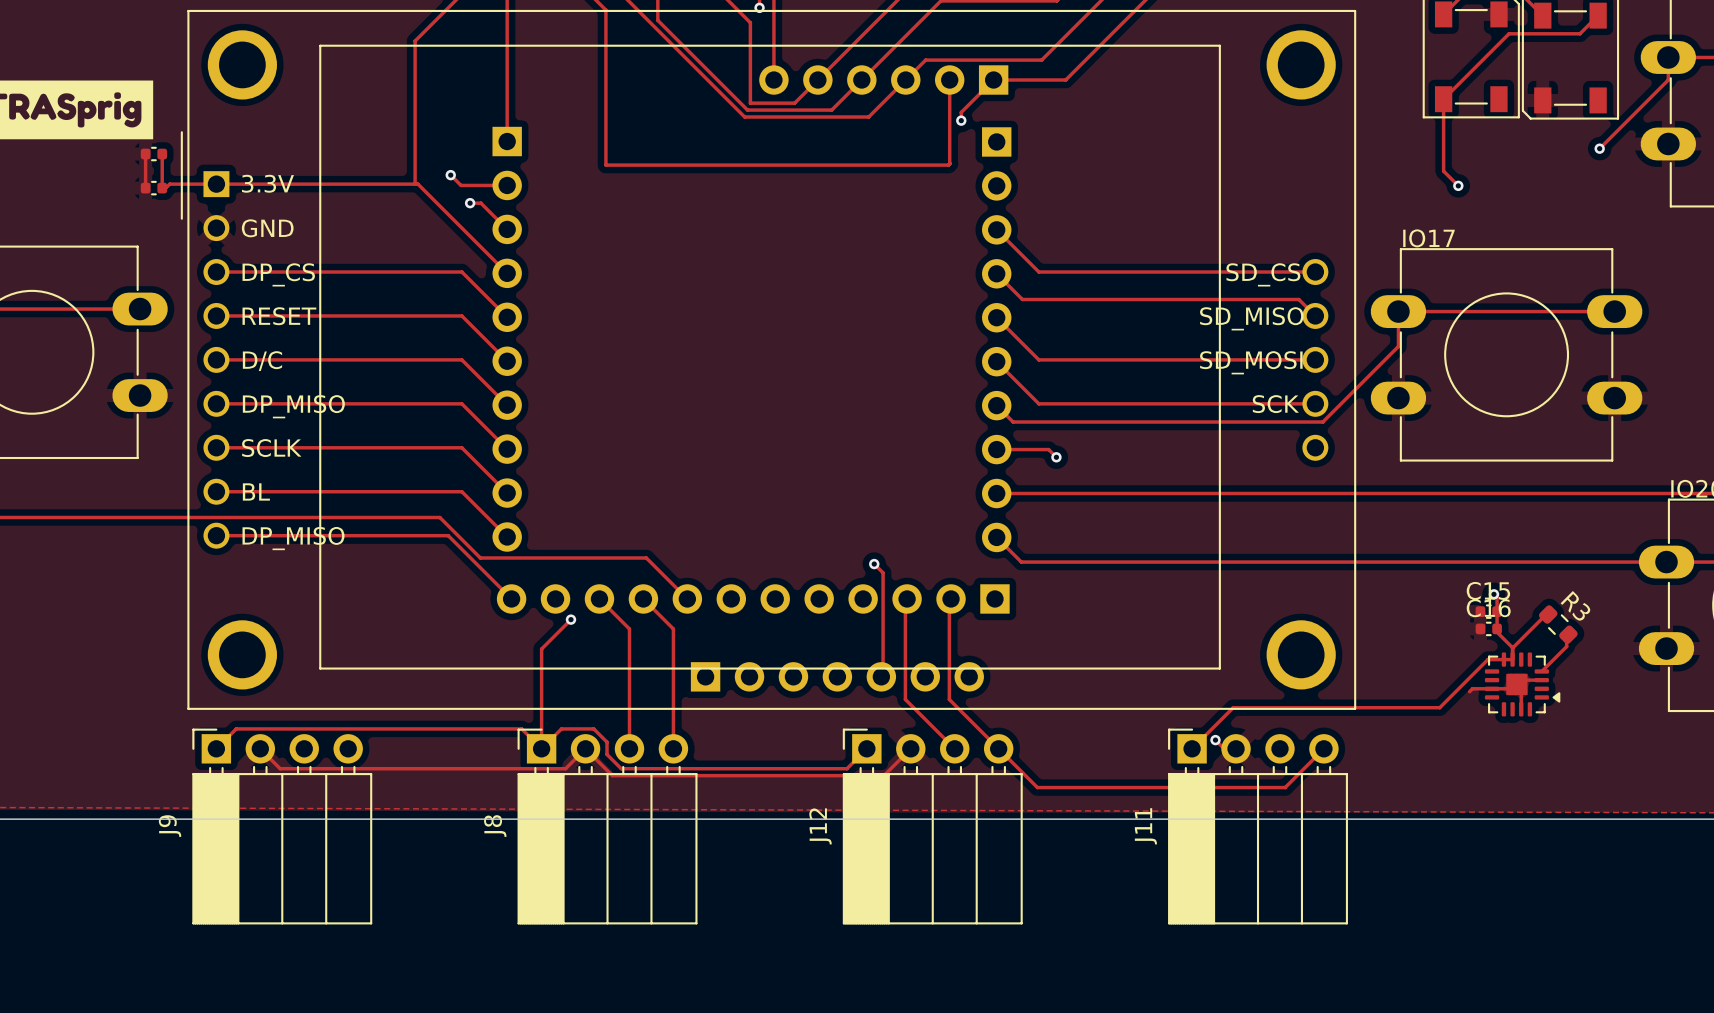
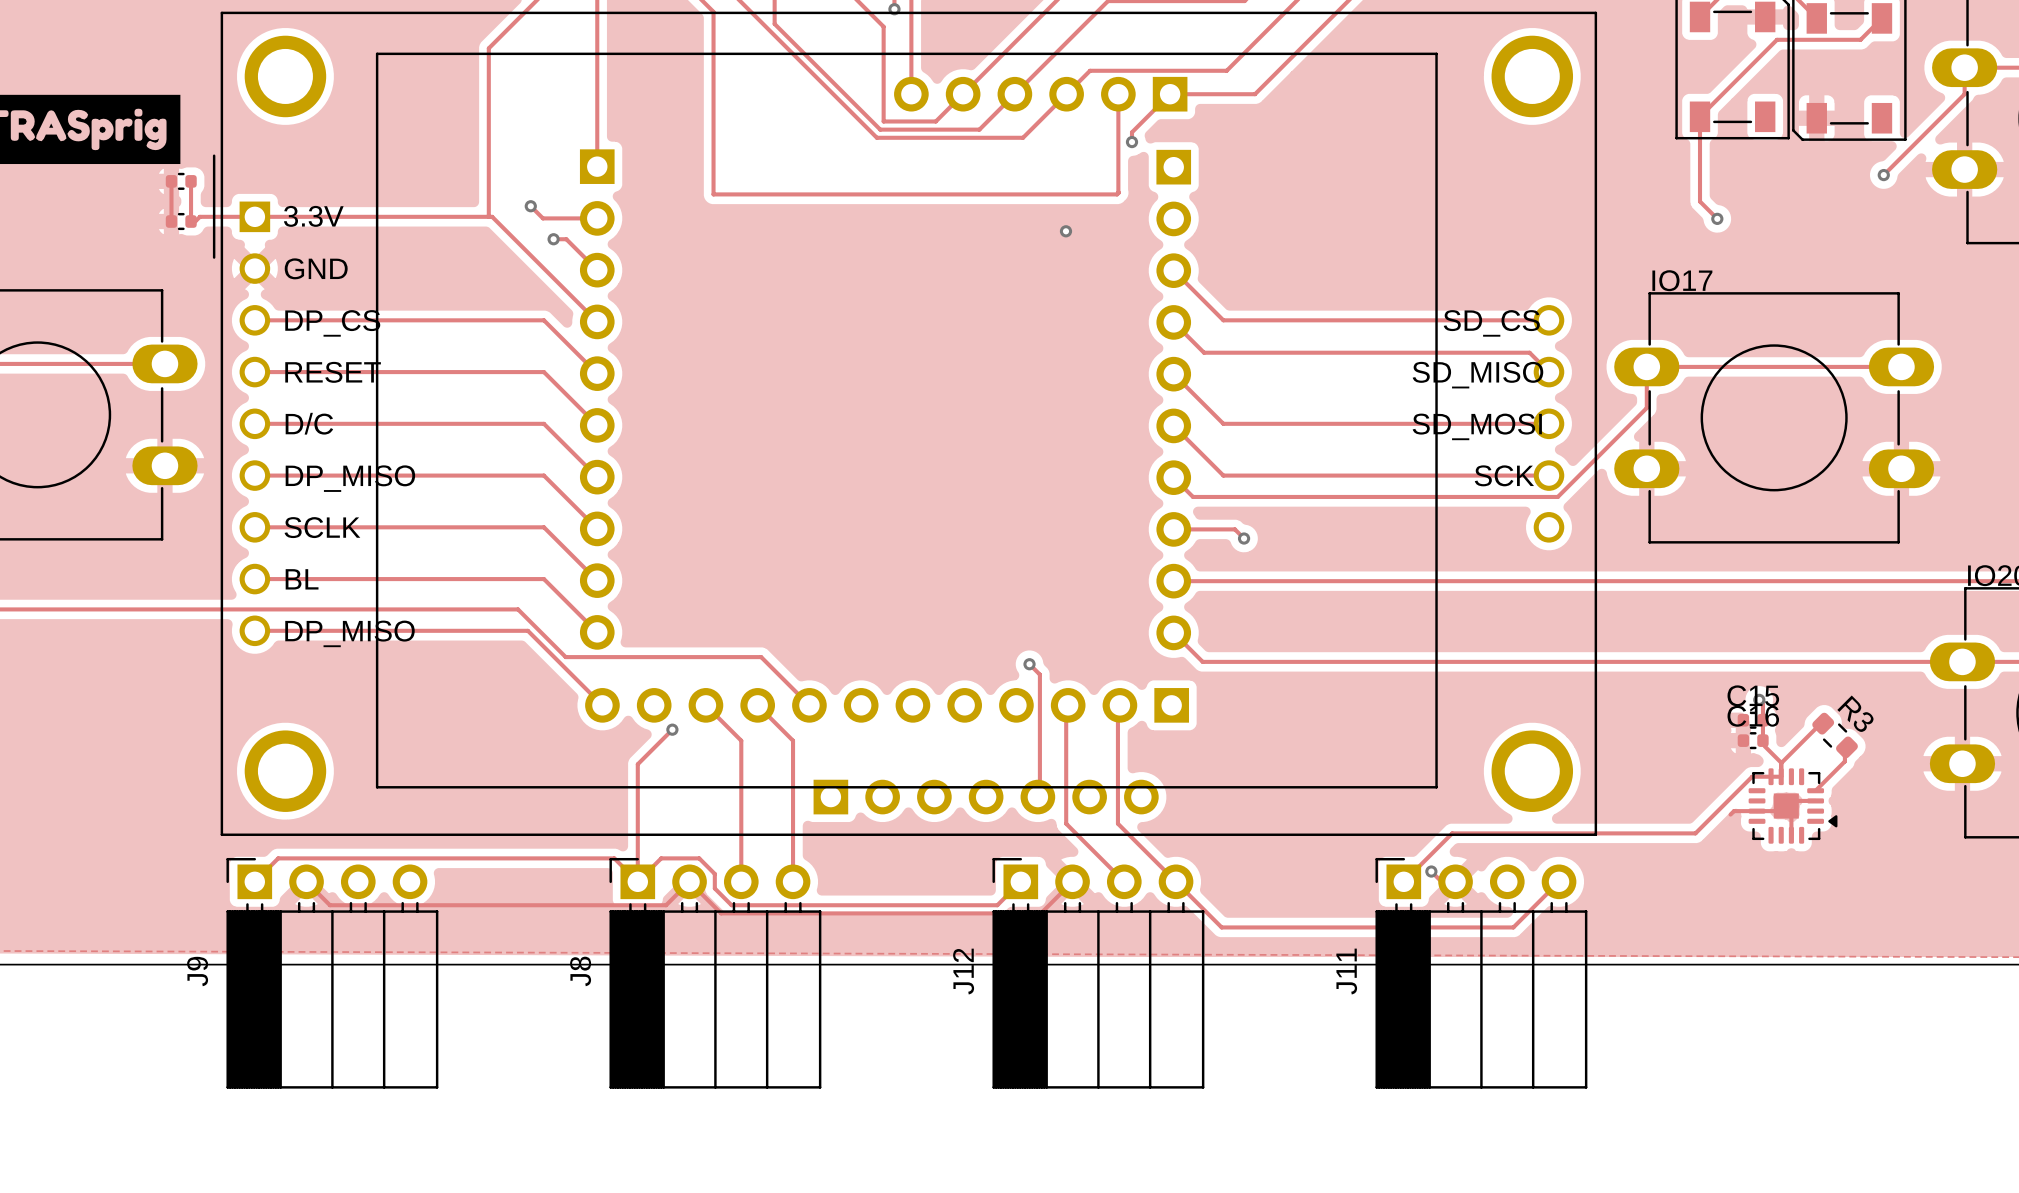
via: none -> (1065, 231)

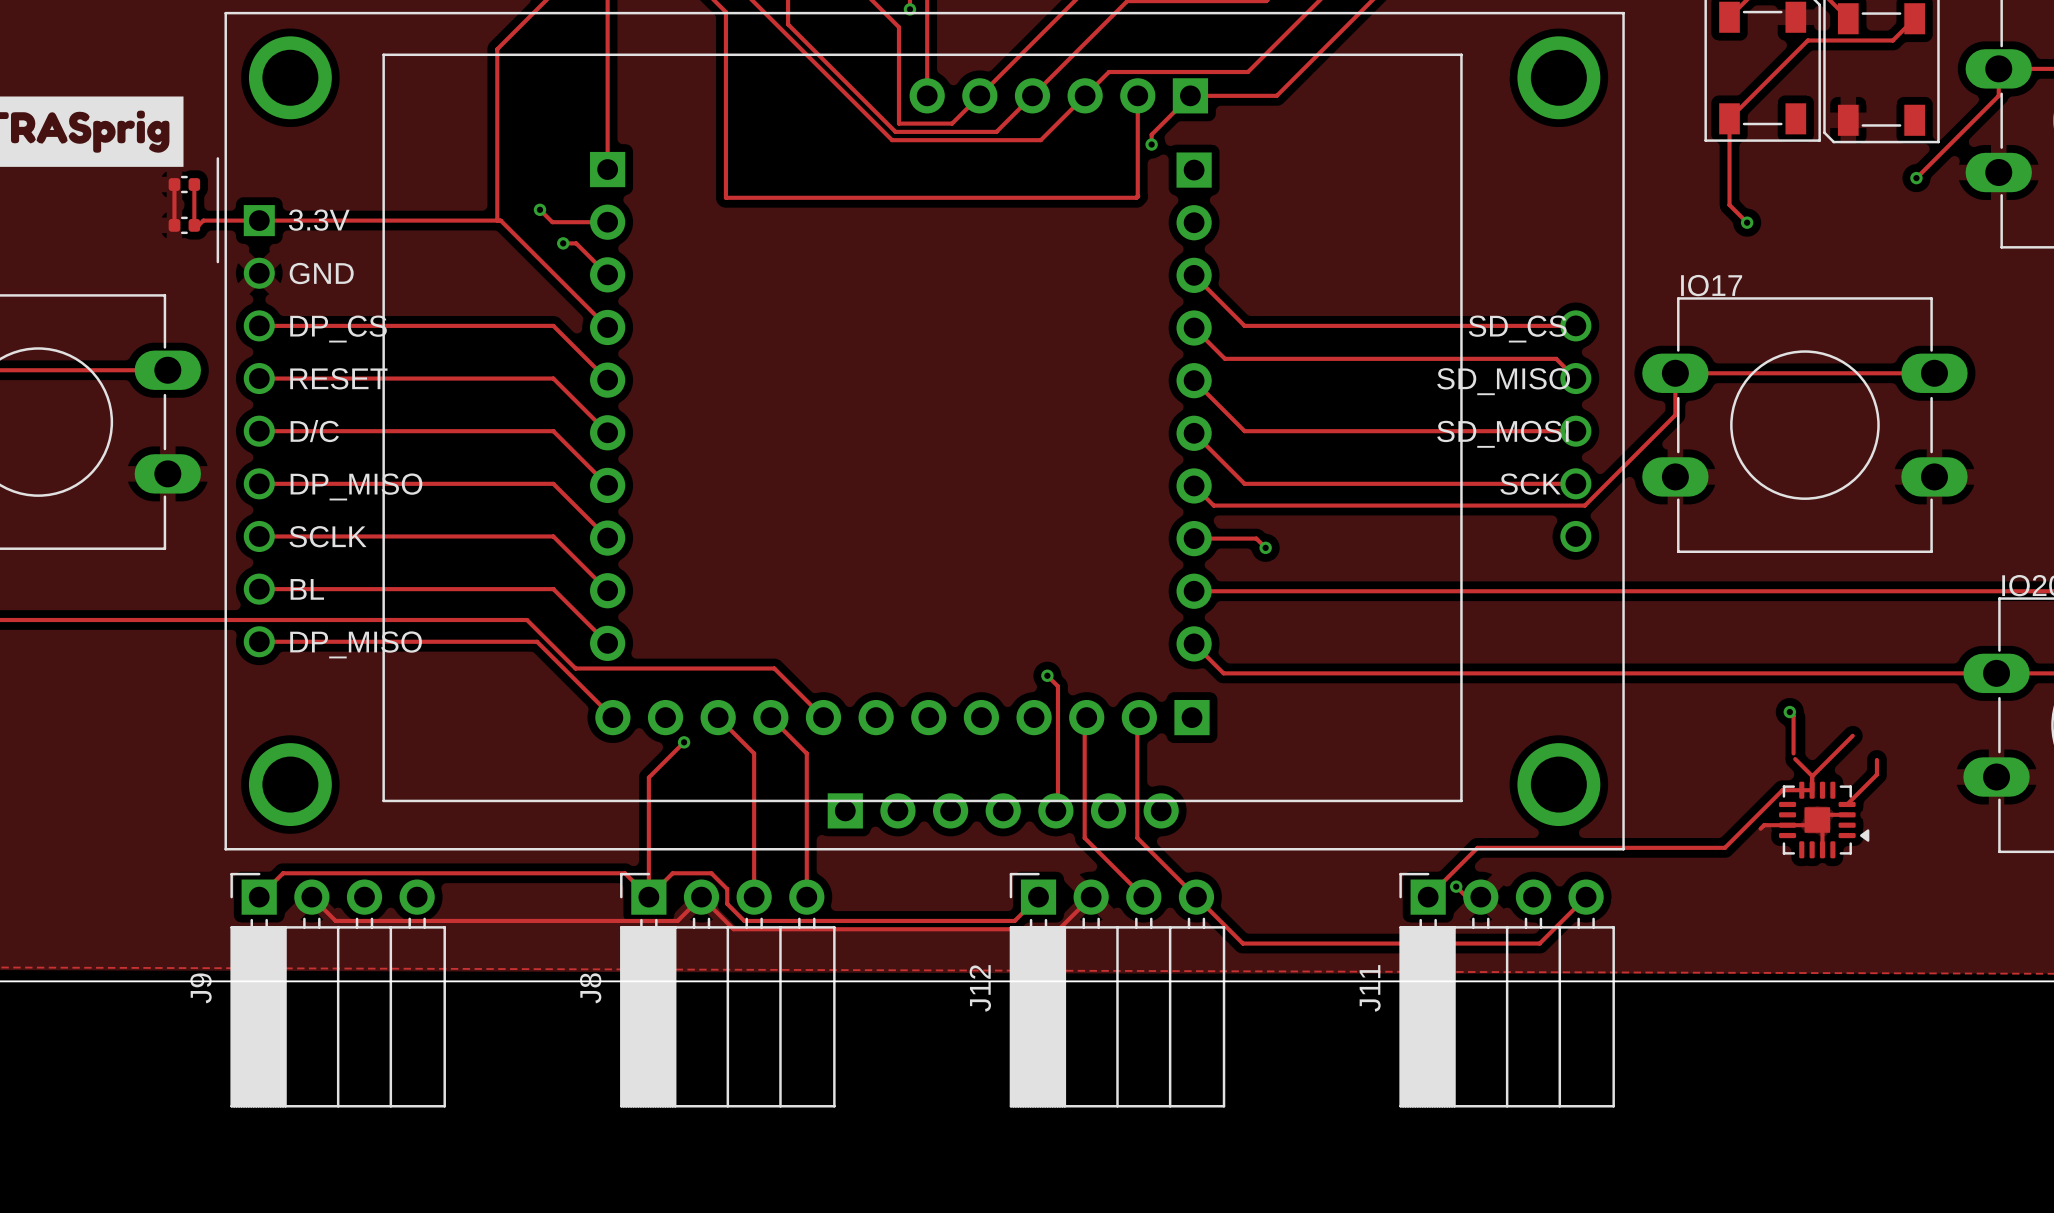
via: (1065, 231) -> none
C15: (1753, 720) -> none
R3: (1835, 735) -> none
C16: (1753, 740) -> none

